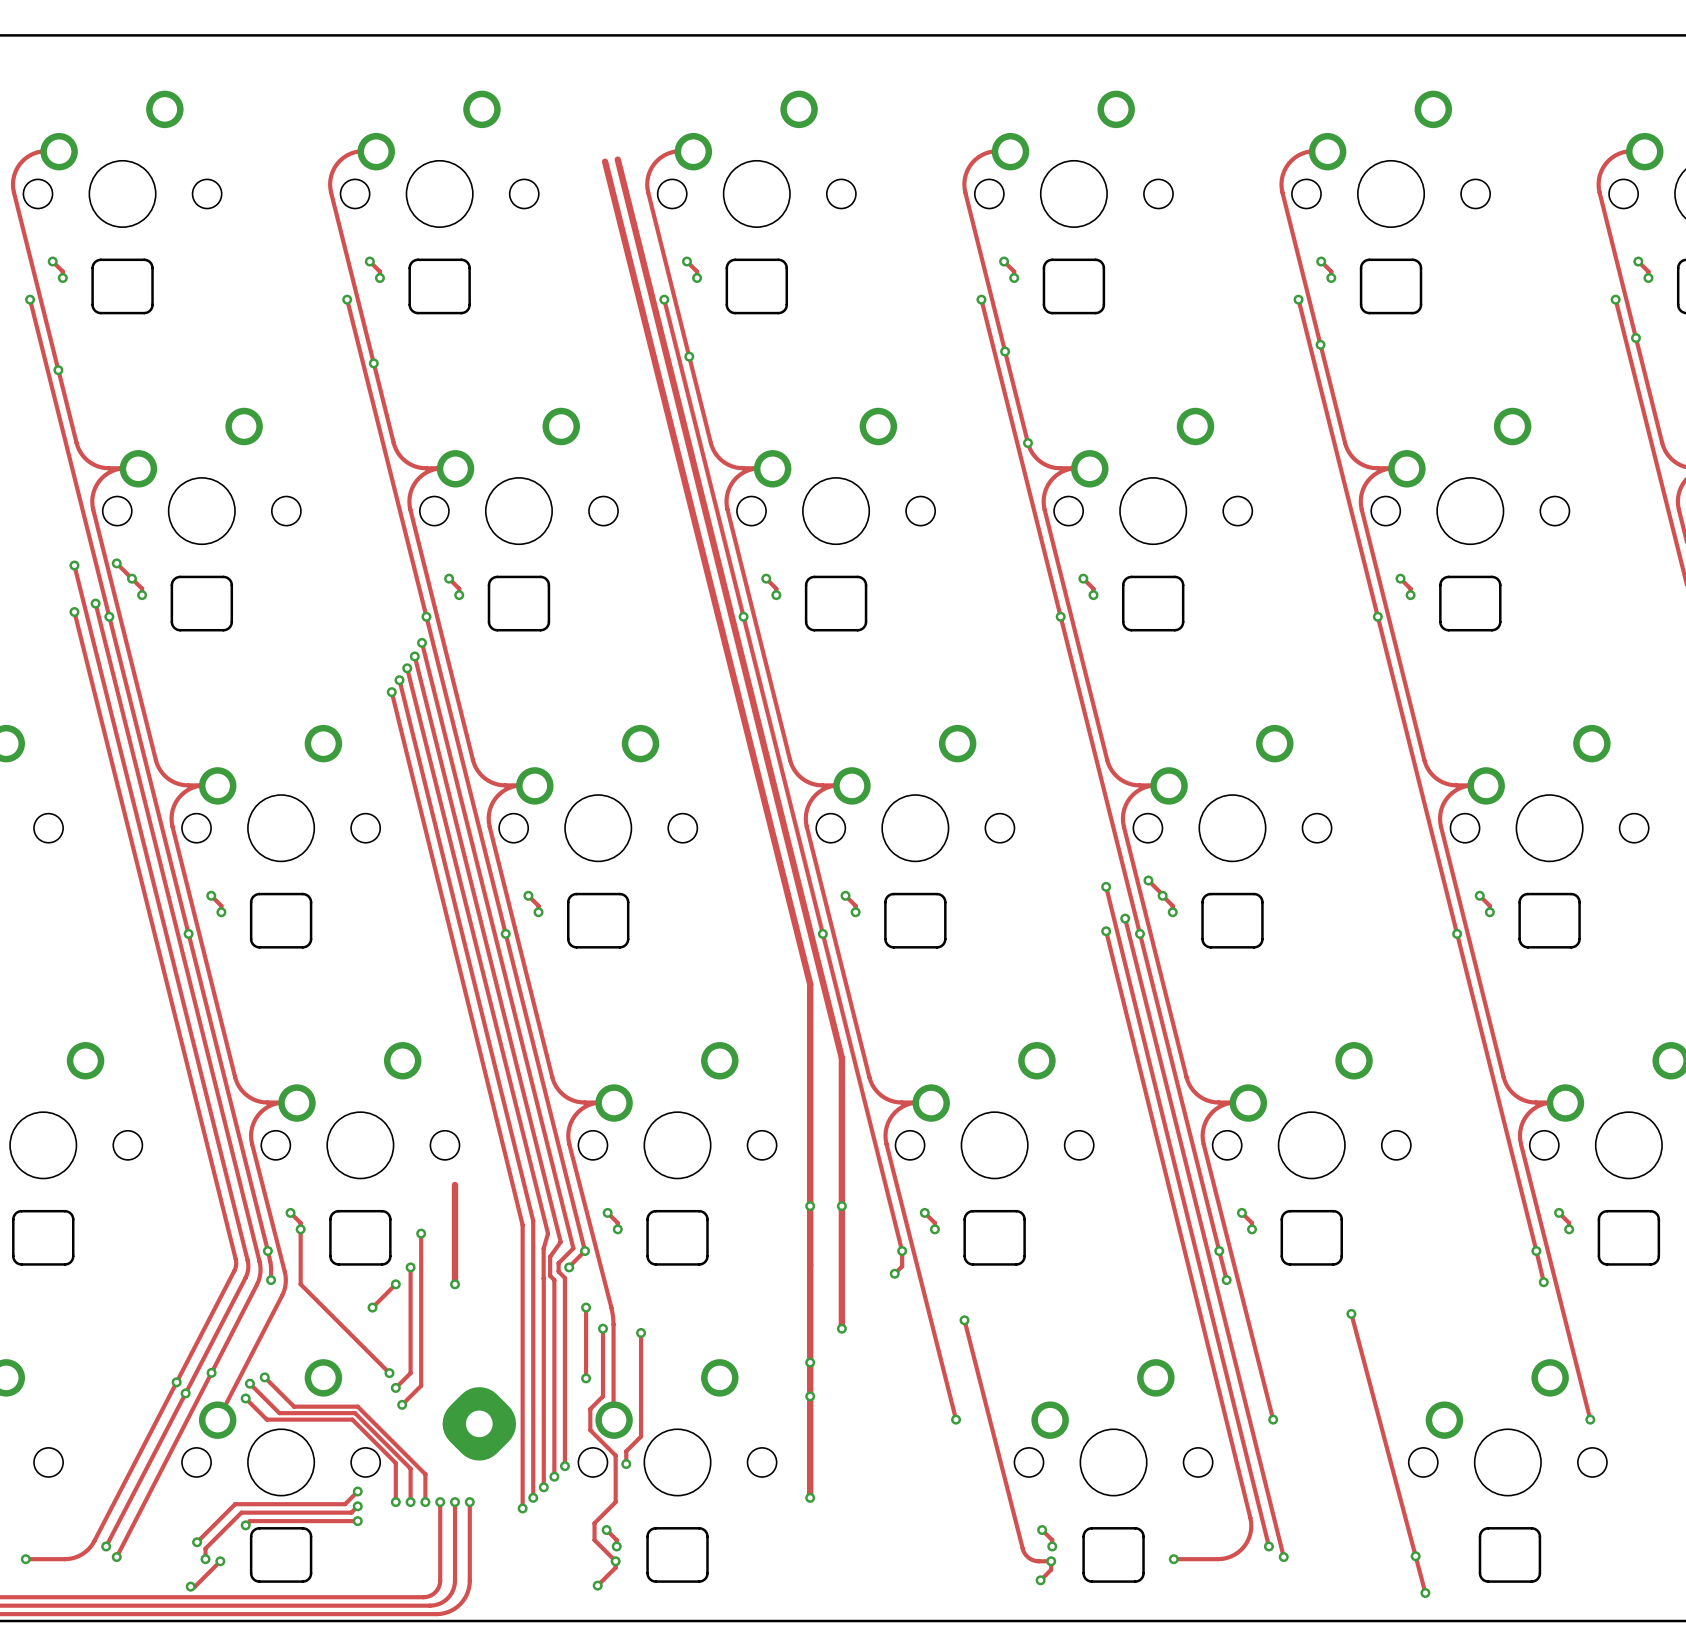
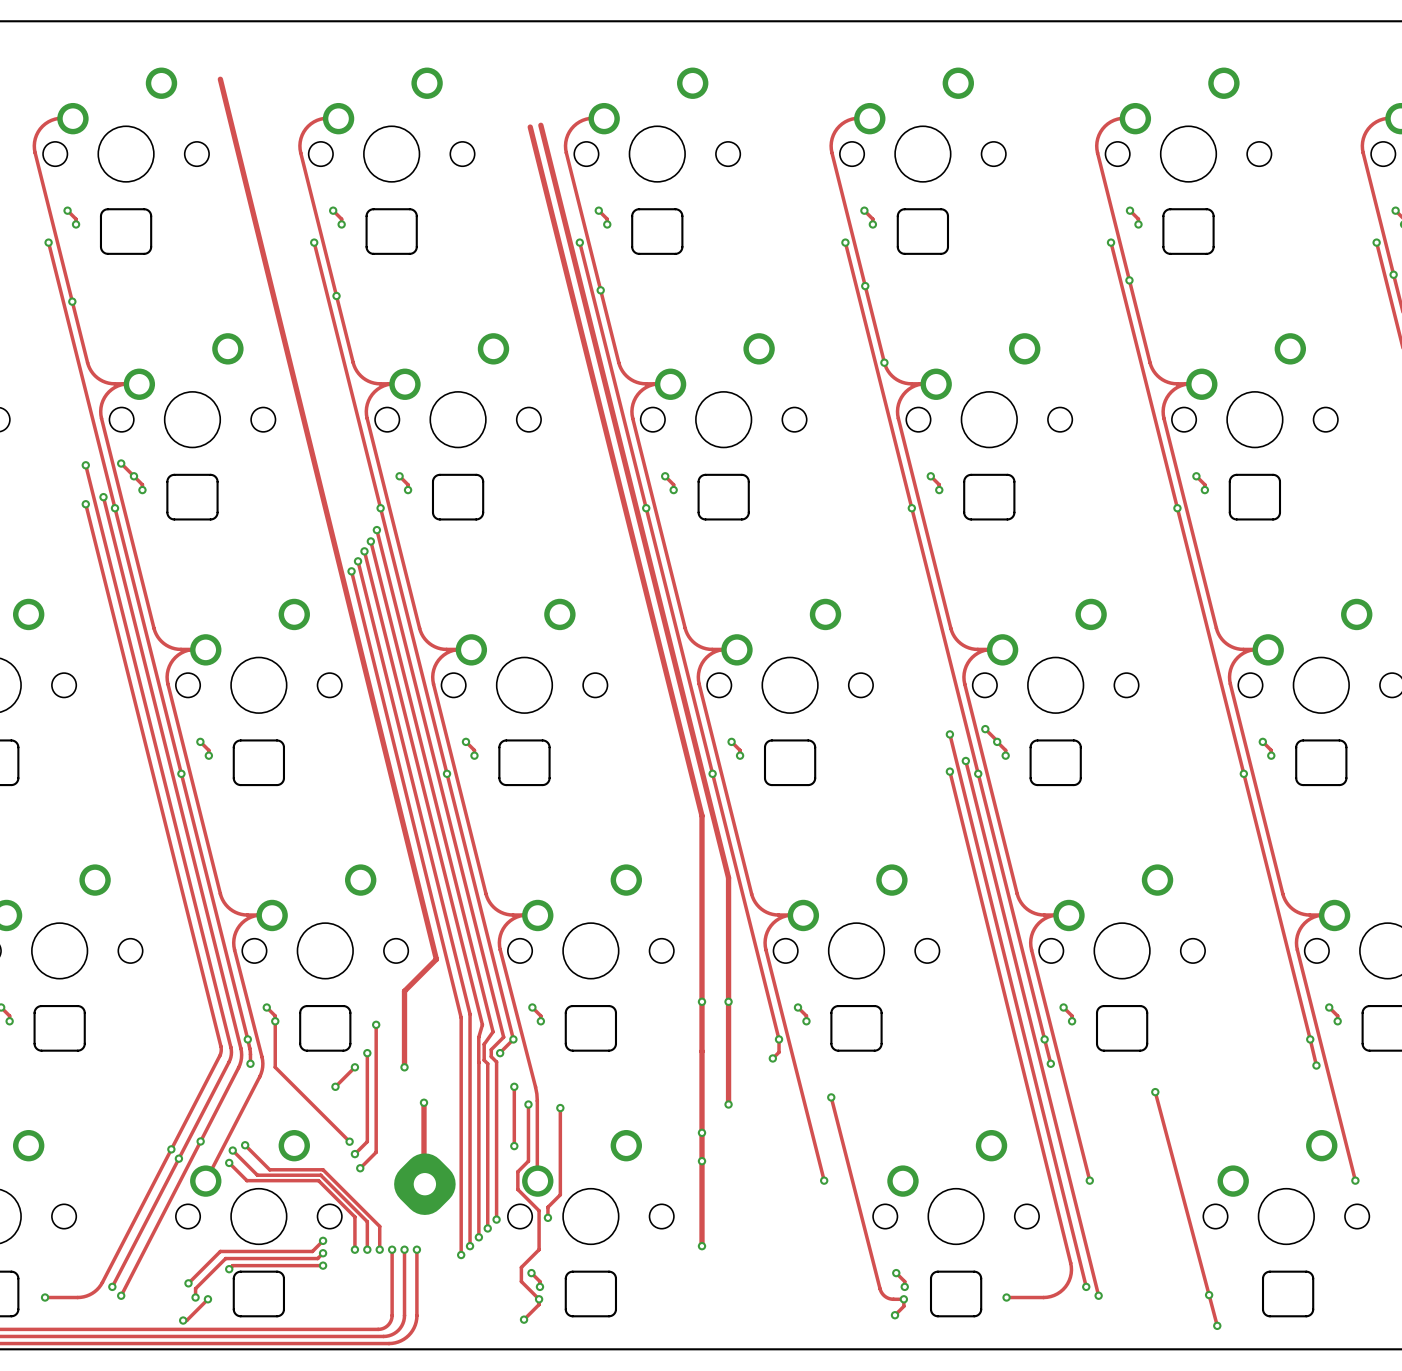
track: (455, 1184) (455, 1193) -> (220, 79) (436, 959) (404, 991)
track: none -> (423, 1102) (424, 1184)
via: none -> (423, 1102)

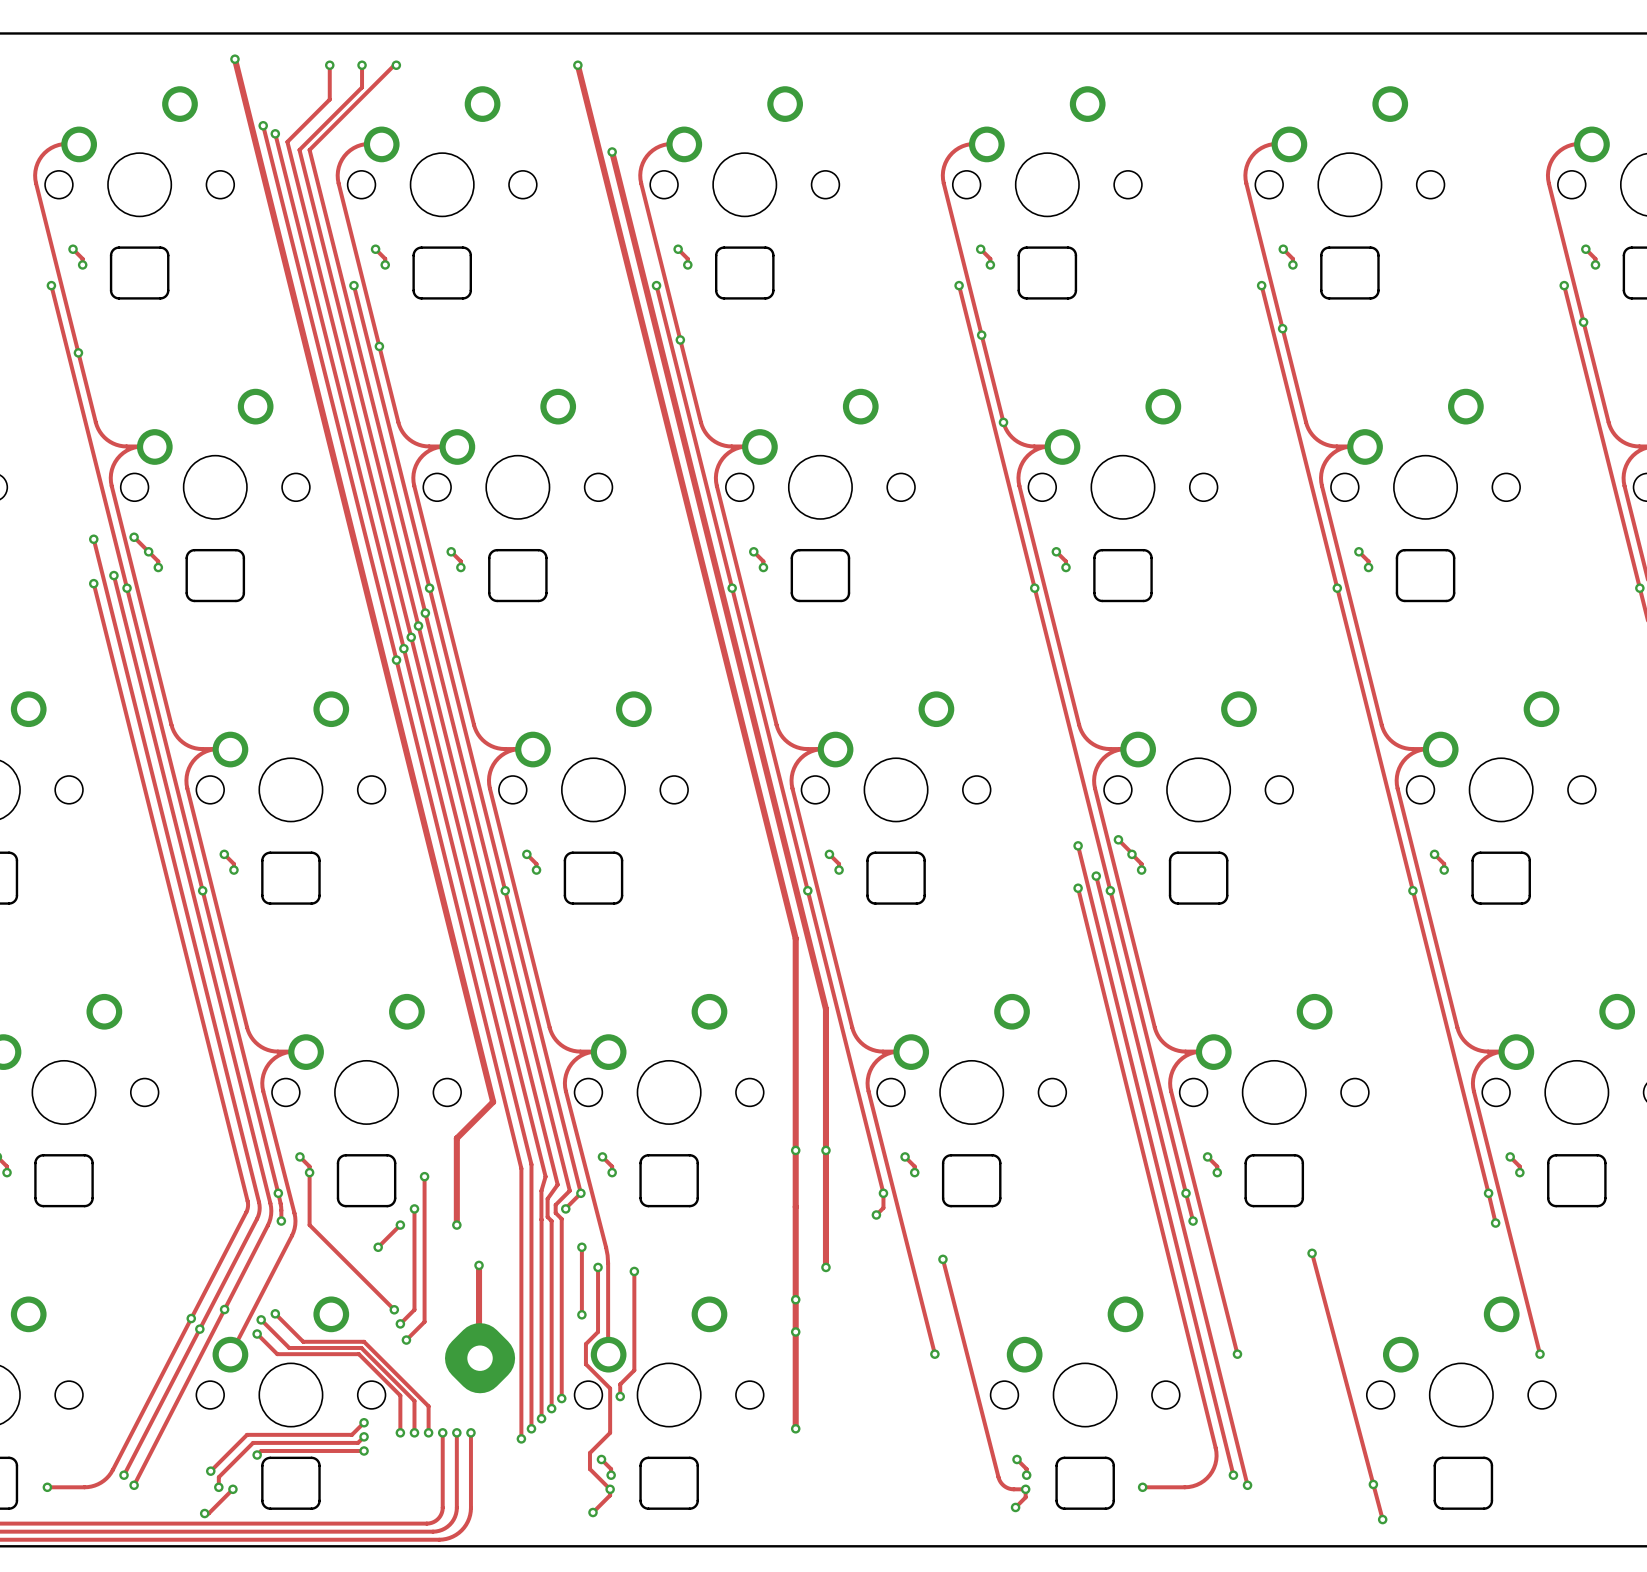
via: none -> (234, 59)
track: none -> (329, 65) (329, 99) (287, 141) (411, 637)
via: none -> (329, 65)
track: none -> (362, 65) (362, 87) (299, 149) (418, 626)
via: none -> (362, 65)
track: none -> (396, 65) (309, 149) (425, 613)
via: none -> (396, 65)
via: none -> (577, 65)
track: (220, 79) (436, 959) -> (234, 59) (493, 1102)
track: none -> (263, 125) (396, 660)
via: none -> (263, 125)
track: none -> (275, 133) (403, 648)
via: none -> (275, 133)
via: none -> (612, 151)
track: (530, 127) (702, 815) -> (577, 65) (795, 938)

